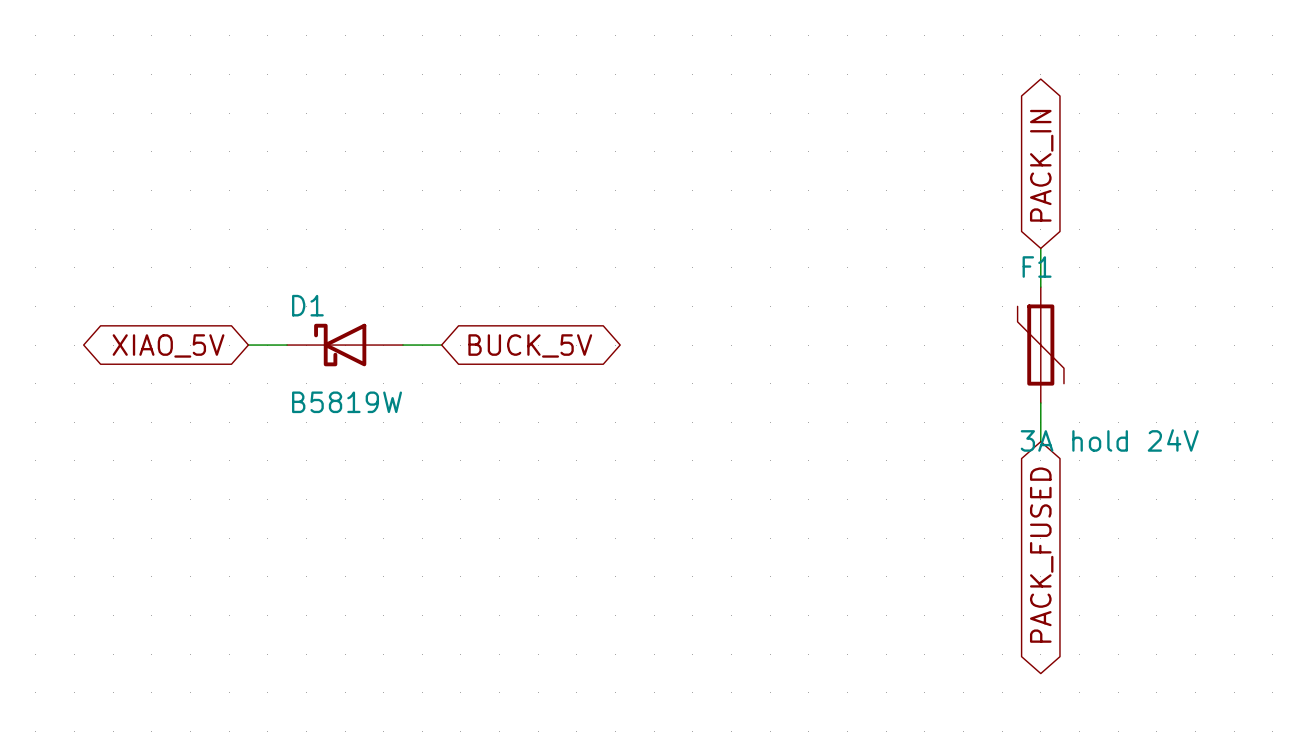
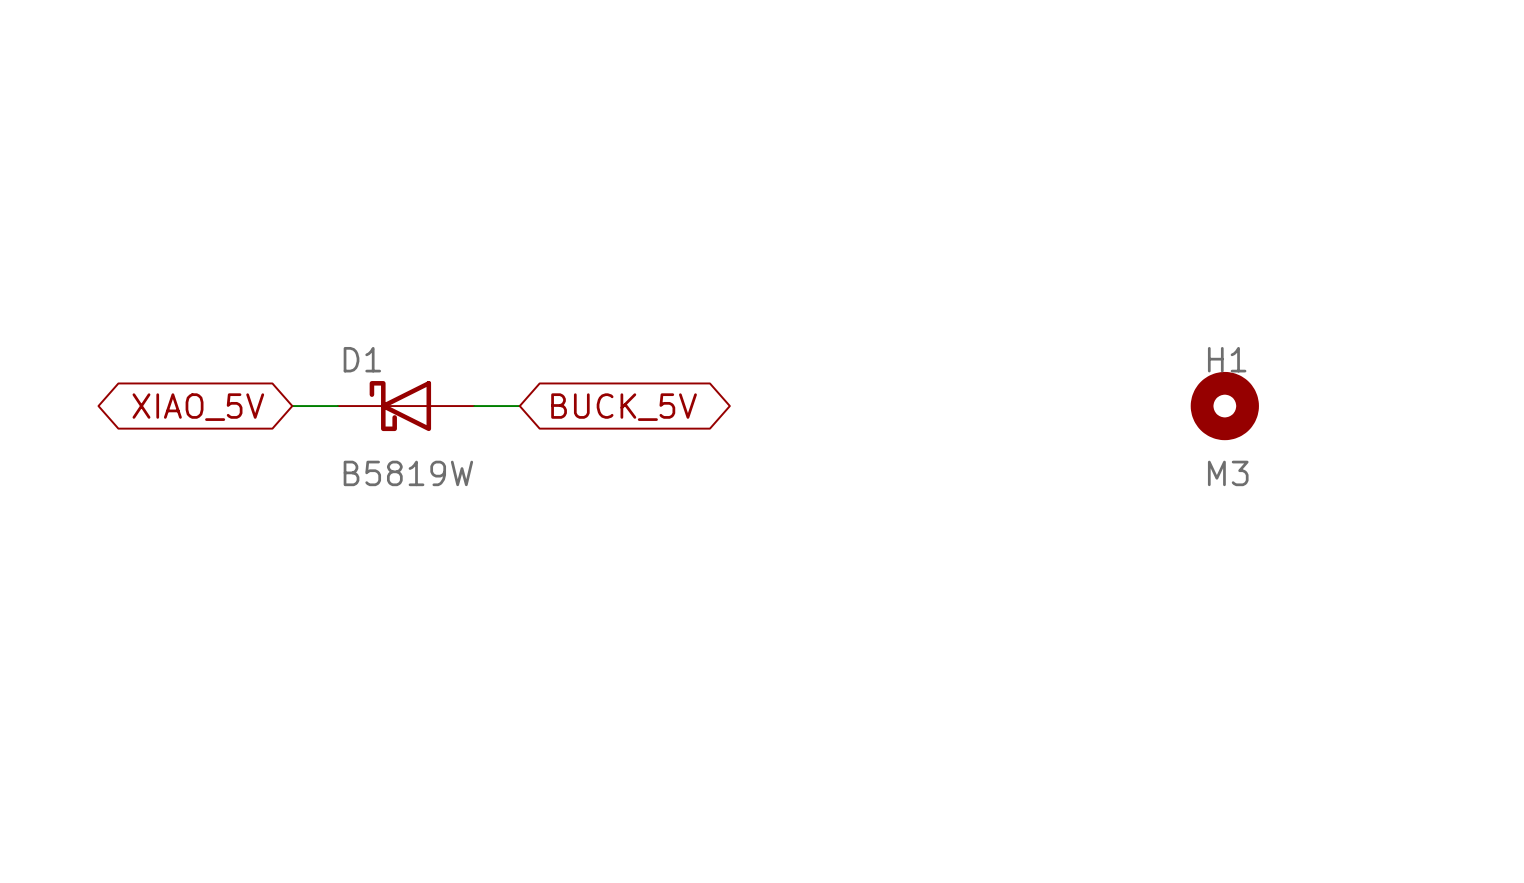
global label: PACK_IN (1041, 165) -> none
wire: (1040, 248) (1040, 287) -> none
F1: 3A hold 24V (1040, 345) -> none
H1: none -> M3 (1224, 406)
wire: (1040, 403) (1040, 441) -> none
global label: PACK_FUSED (1041, 555) -> none

